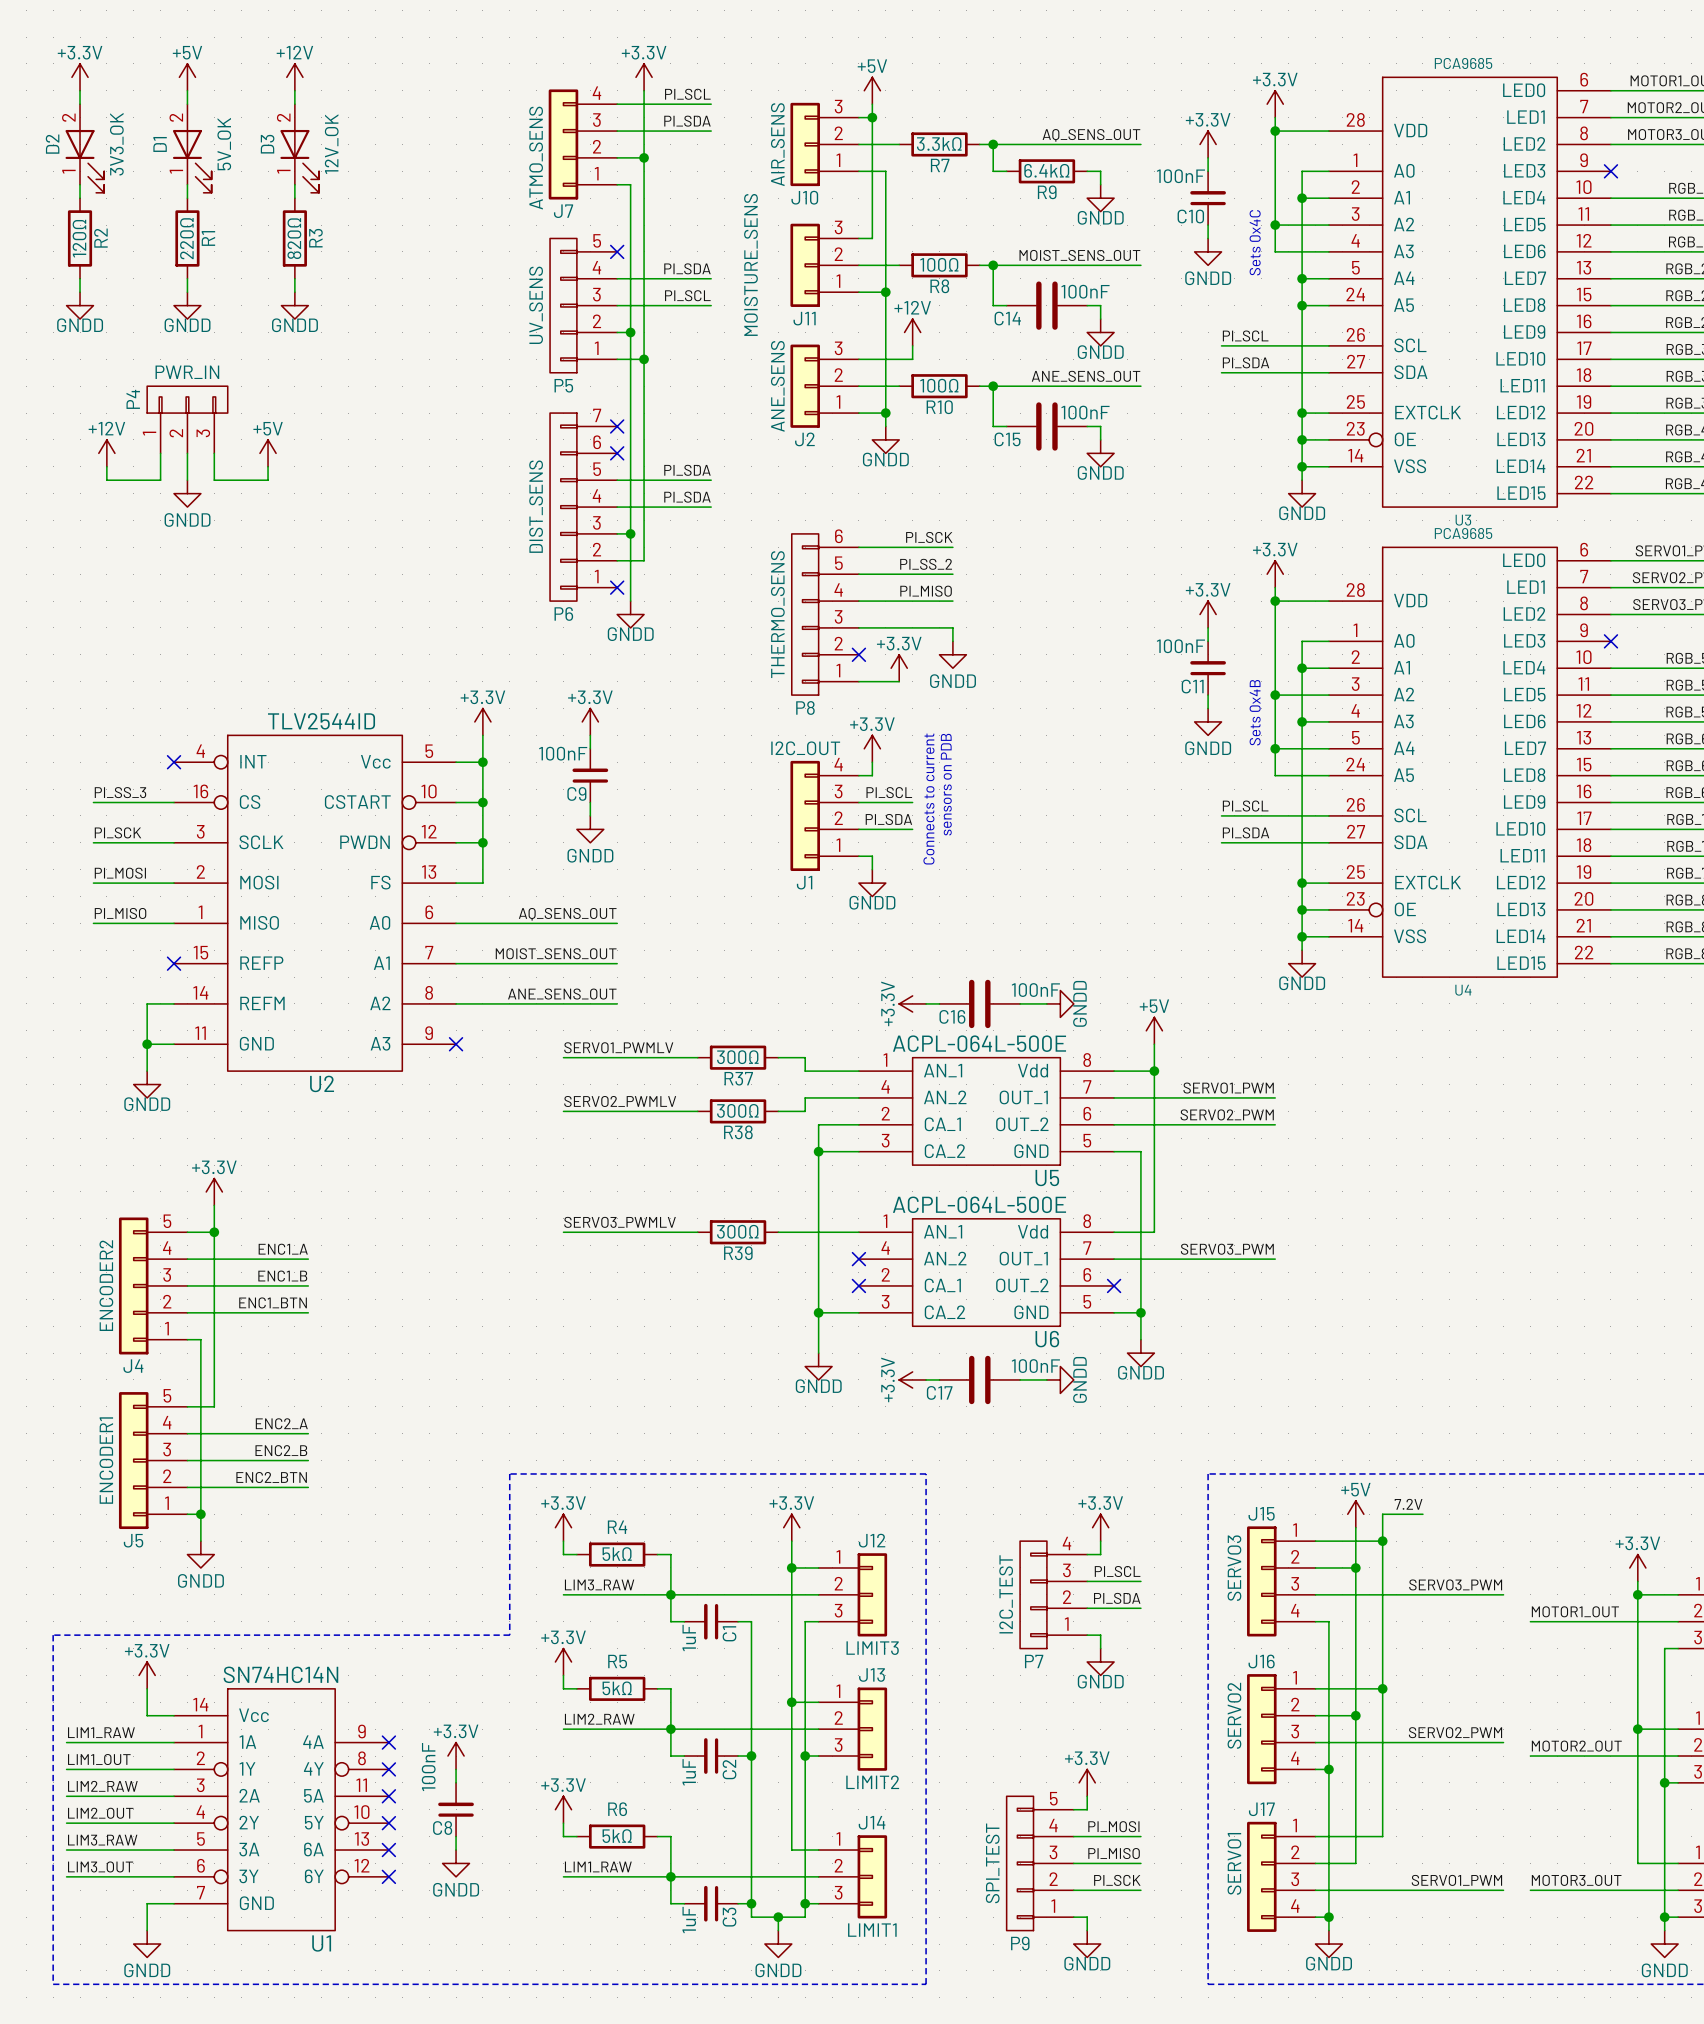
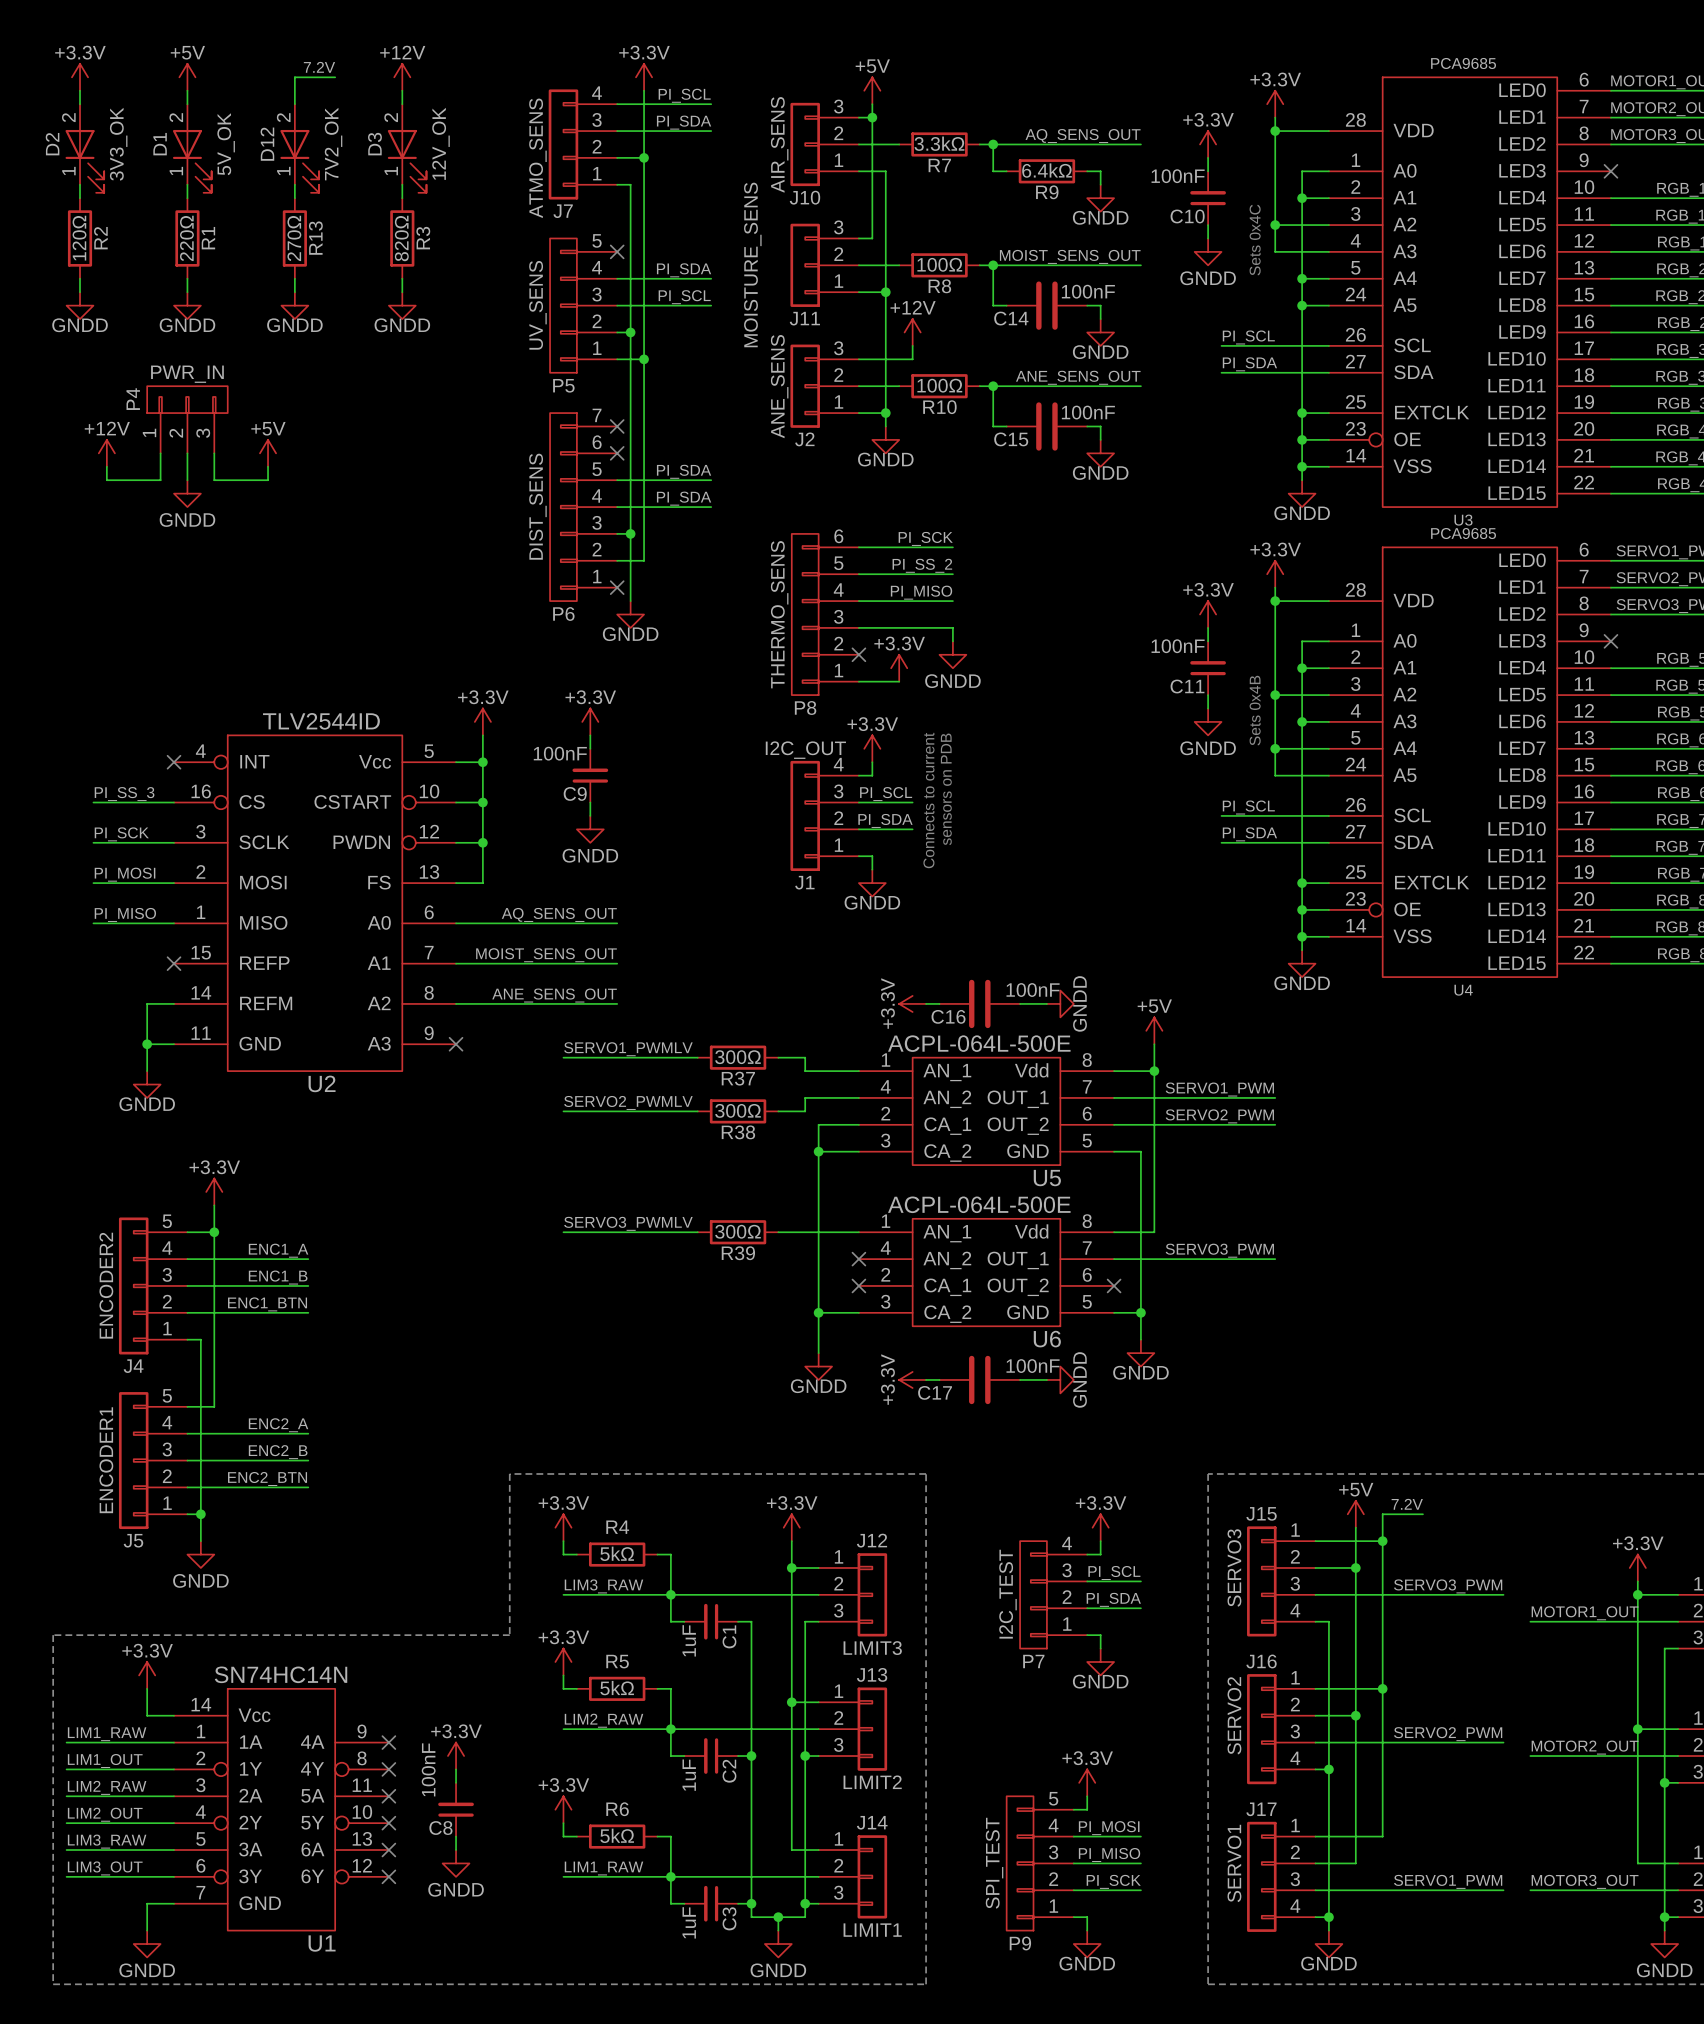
label: none -> 7.2V (319, 67)
power symbol position: +12V (294, 77) -> +12V (402, 77)
wire: none -> (335, 77) (294, 77) (294, 90)
wire: none -> (402, 90) (402, 104)
D3 name: D3 (267, 144) -> D12 (267, 144)
D3 value: 12V_OK (331, 144) -> 7V2_OK (333, 144)
D3: none -> 12V_OK (407, 148)
wire: none -> (402, 184) (402, 198)
R3 value: 820Ω (294, 238) -> 270Ω (294, 238)
R3 name: R3 (315, 238) -> R13 (315, 238)
R3: none -> 820Ω (402, 238)
wire: none -> (402, 278) (402, 292)
power symbol: none -> GNDD (402, 305)

